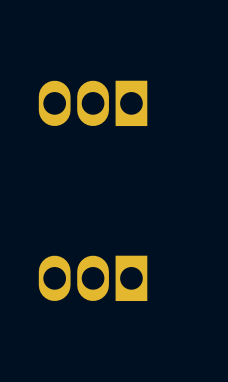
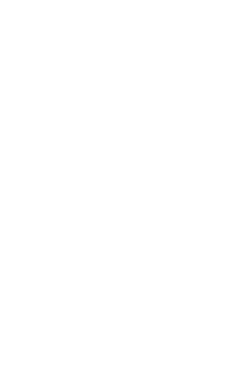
part: (93, 103) -> none
part: (93, 278) -> none

